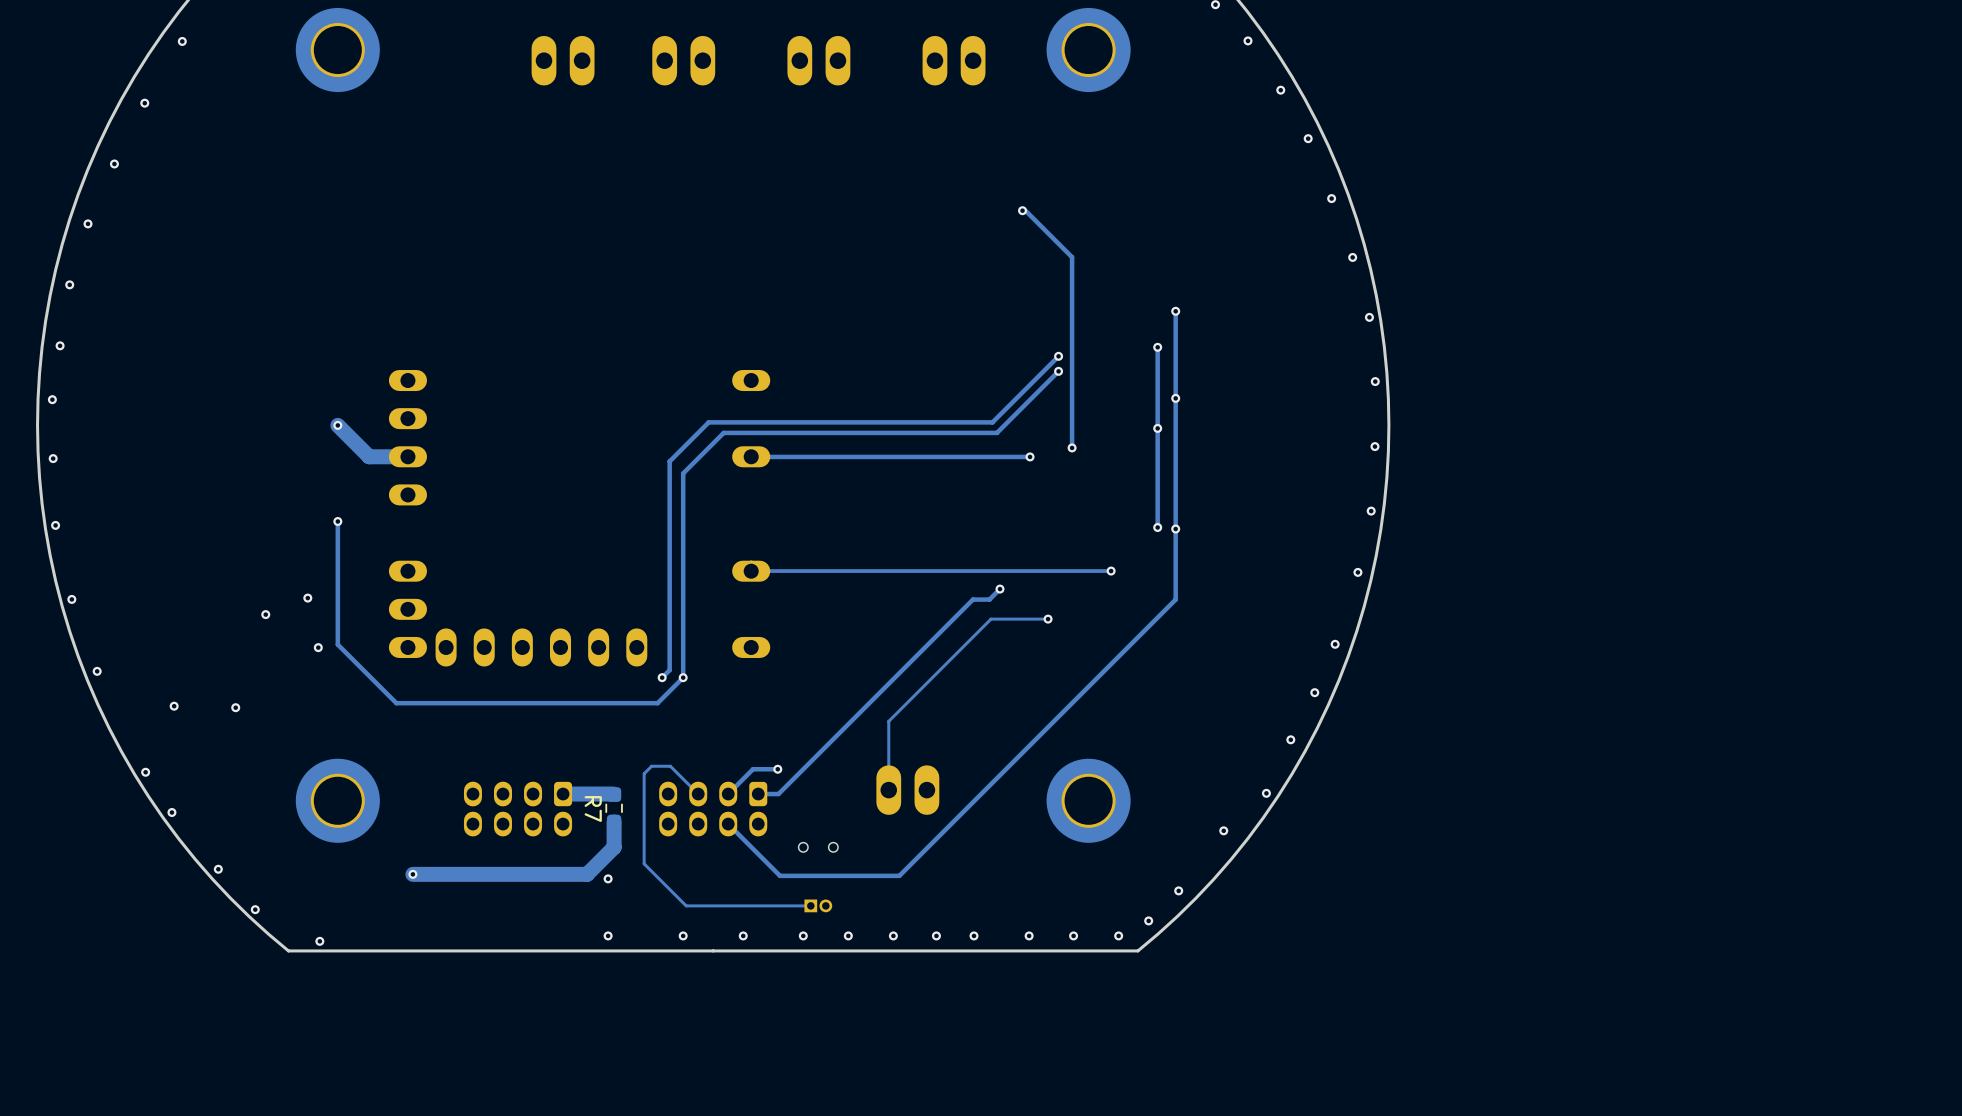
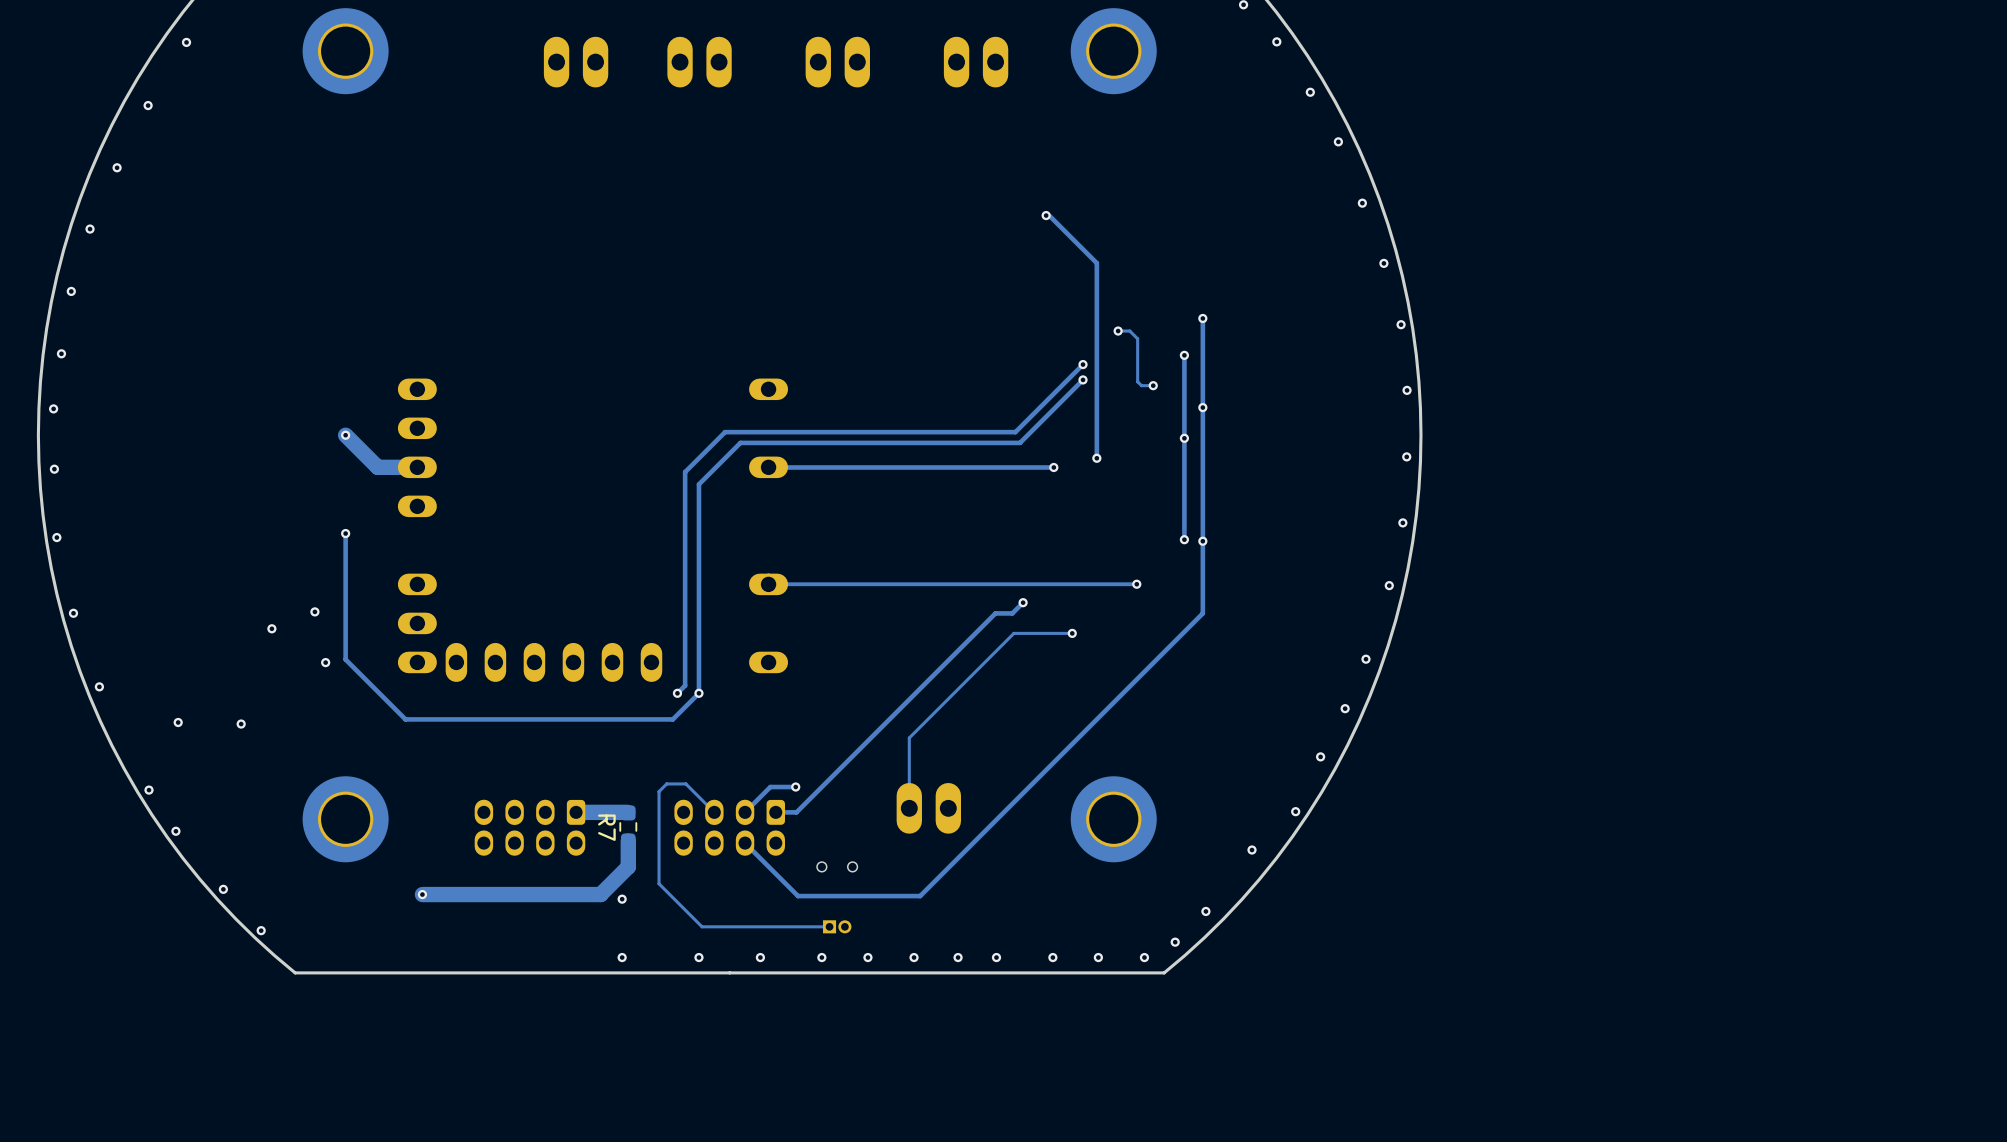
track: none -> (1118, 331) (1129, 331) (1137, 338) (1137, 381) (1141, 385) (1153, 385)
via: none -> (1118, 331)
via: none -> (1153, 385)
via: (319, 941) -> none

